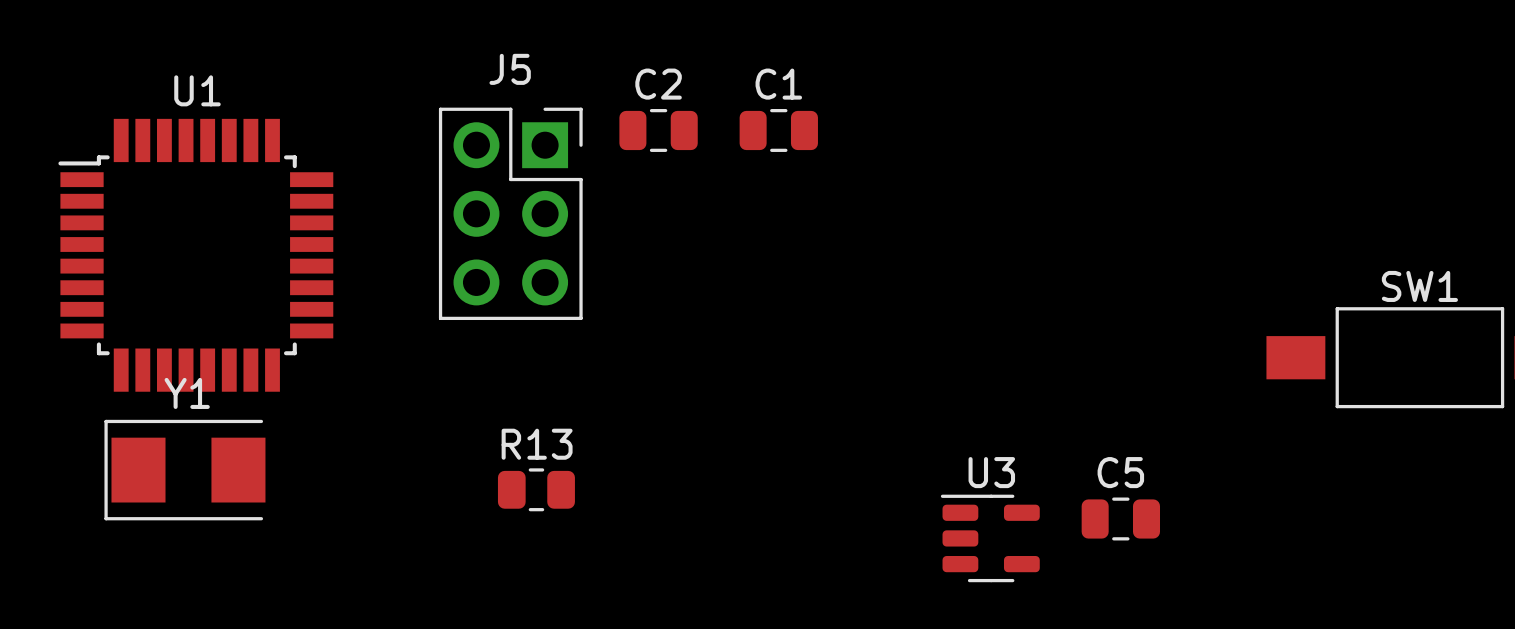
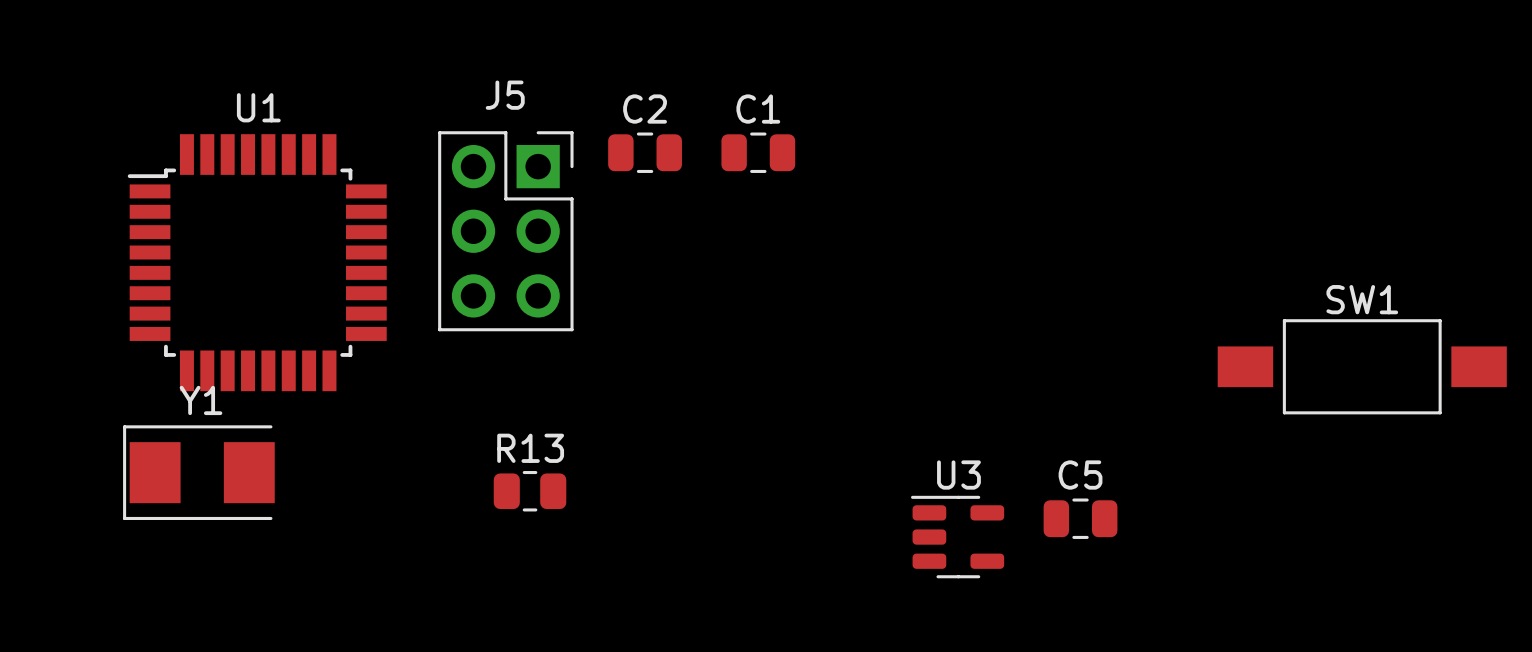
U1 position: (195, 255) -> (257, 262)

